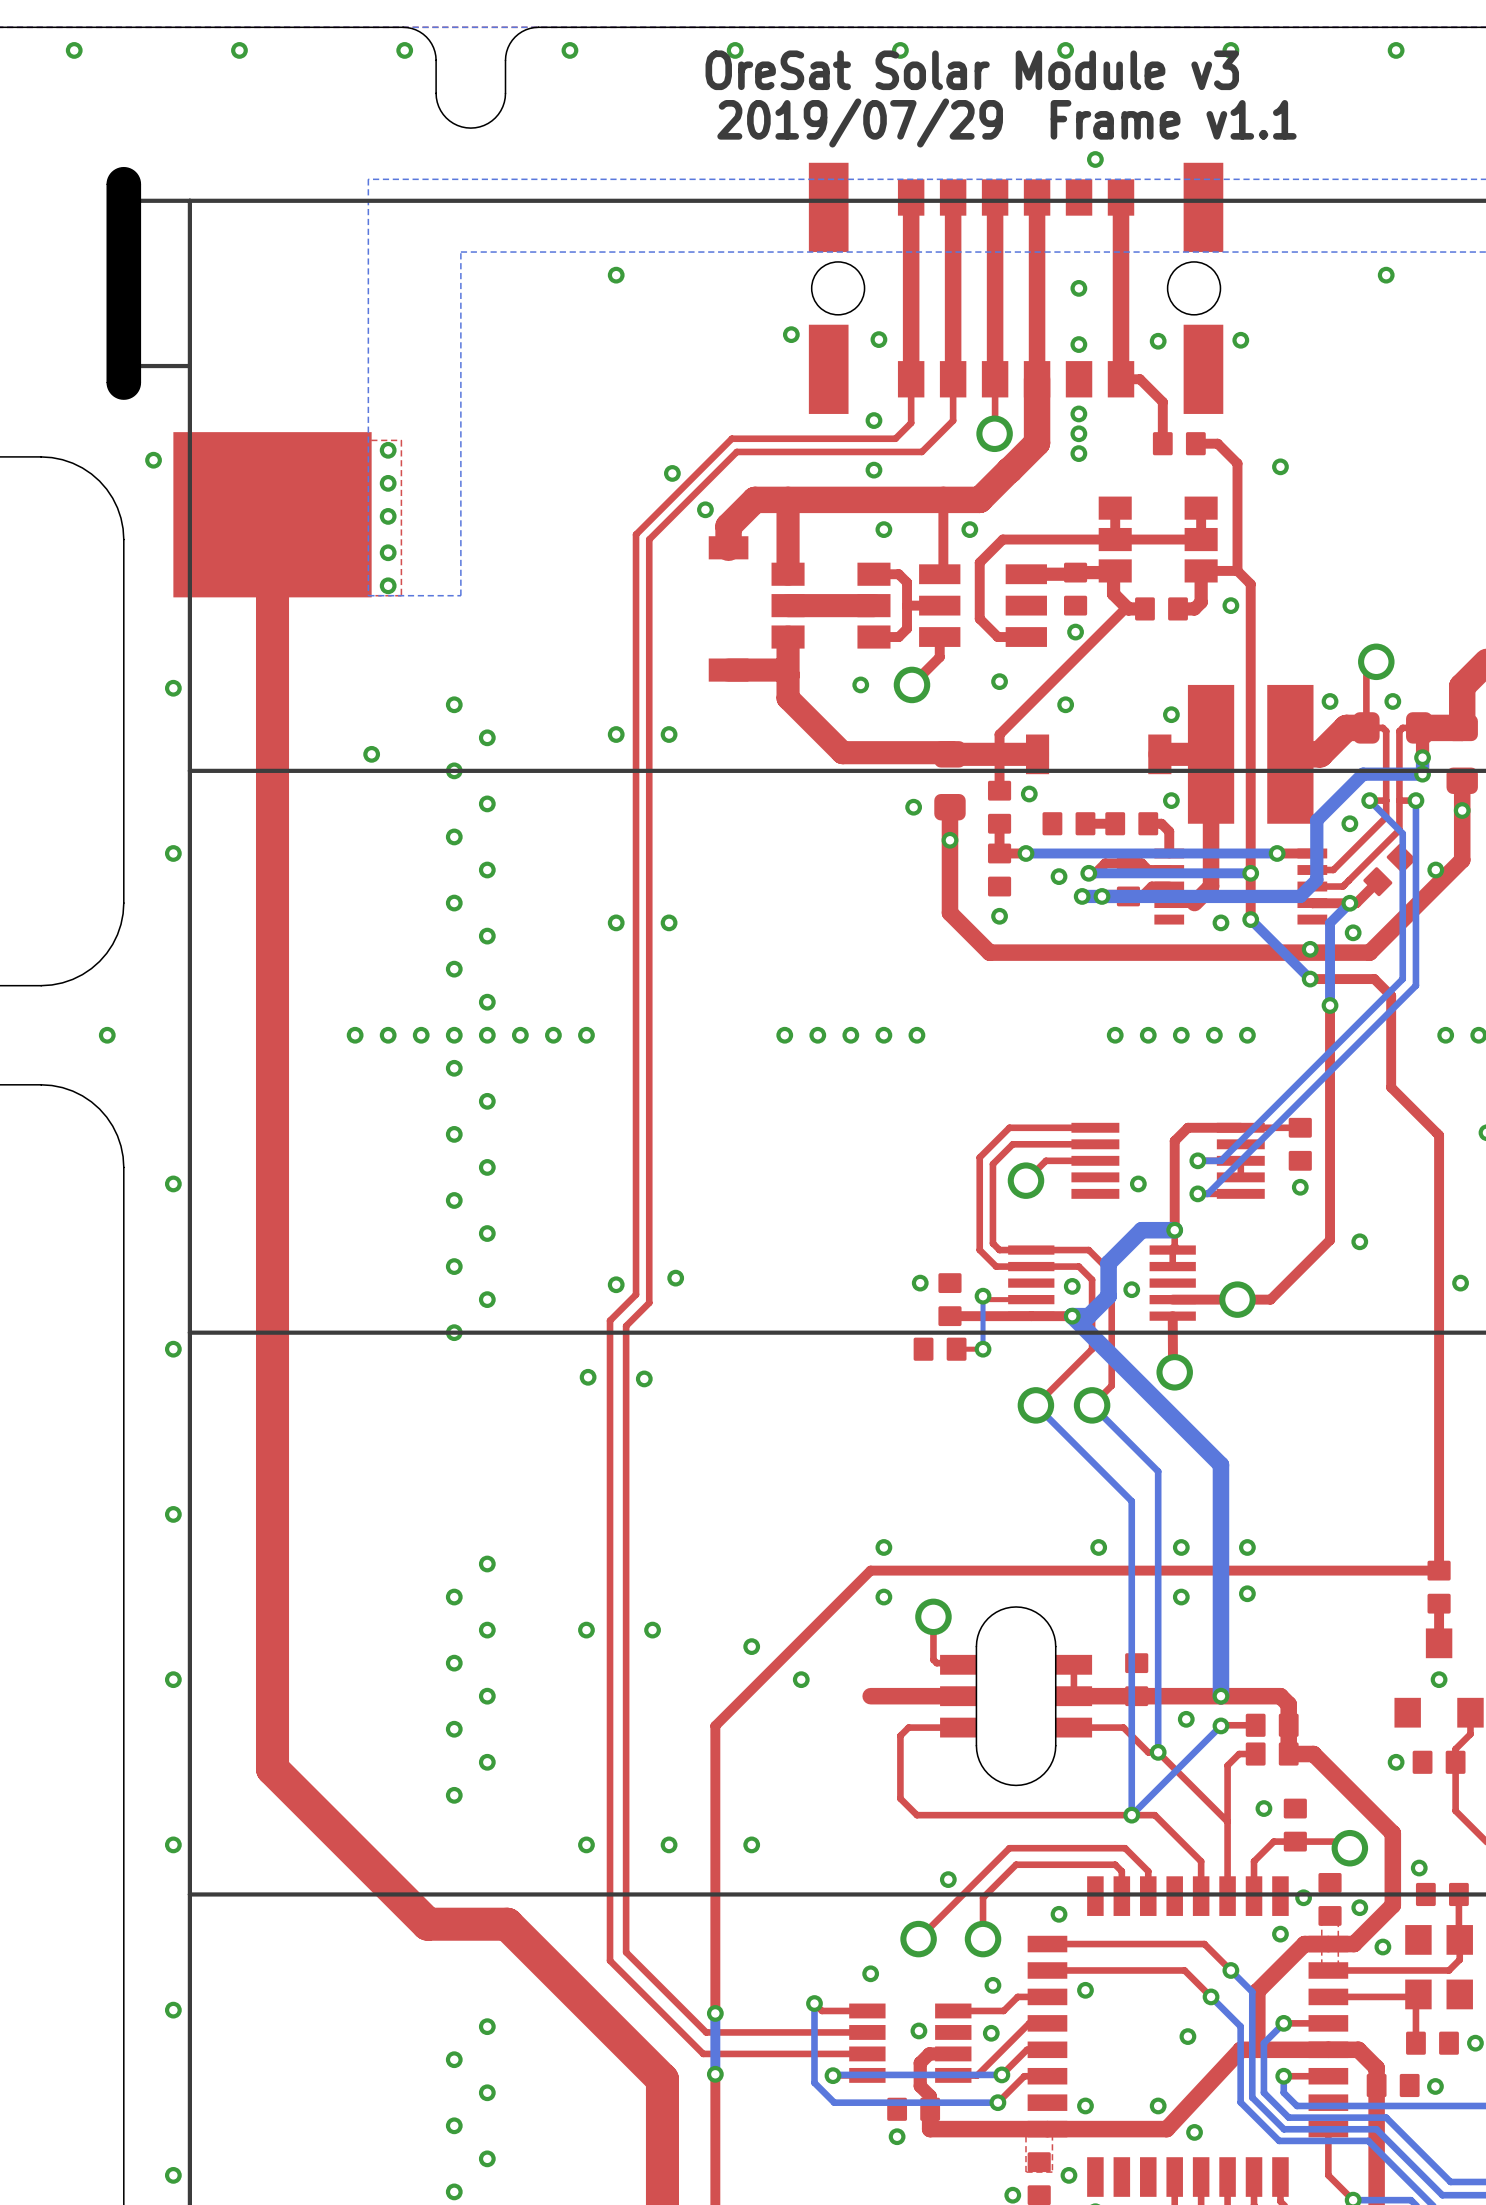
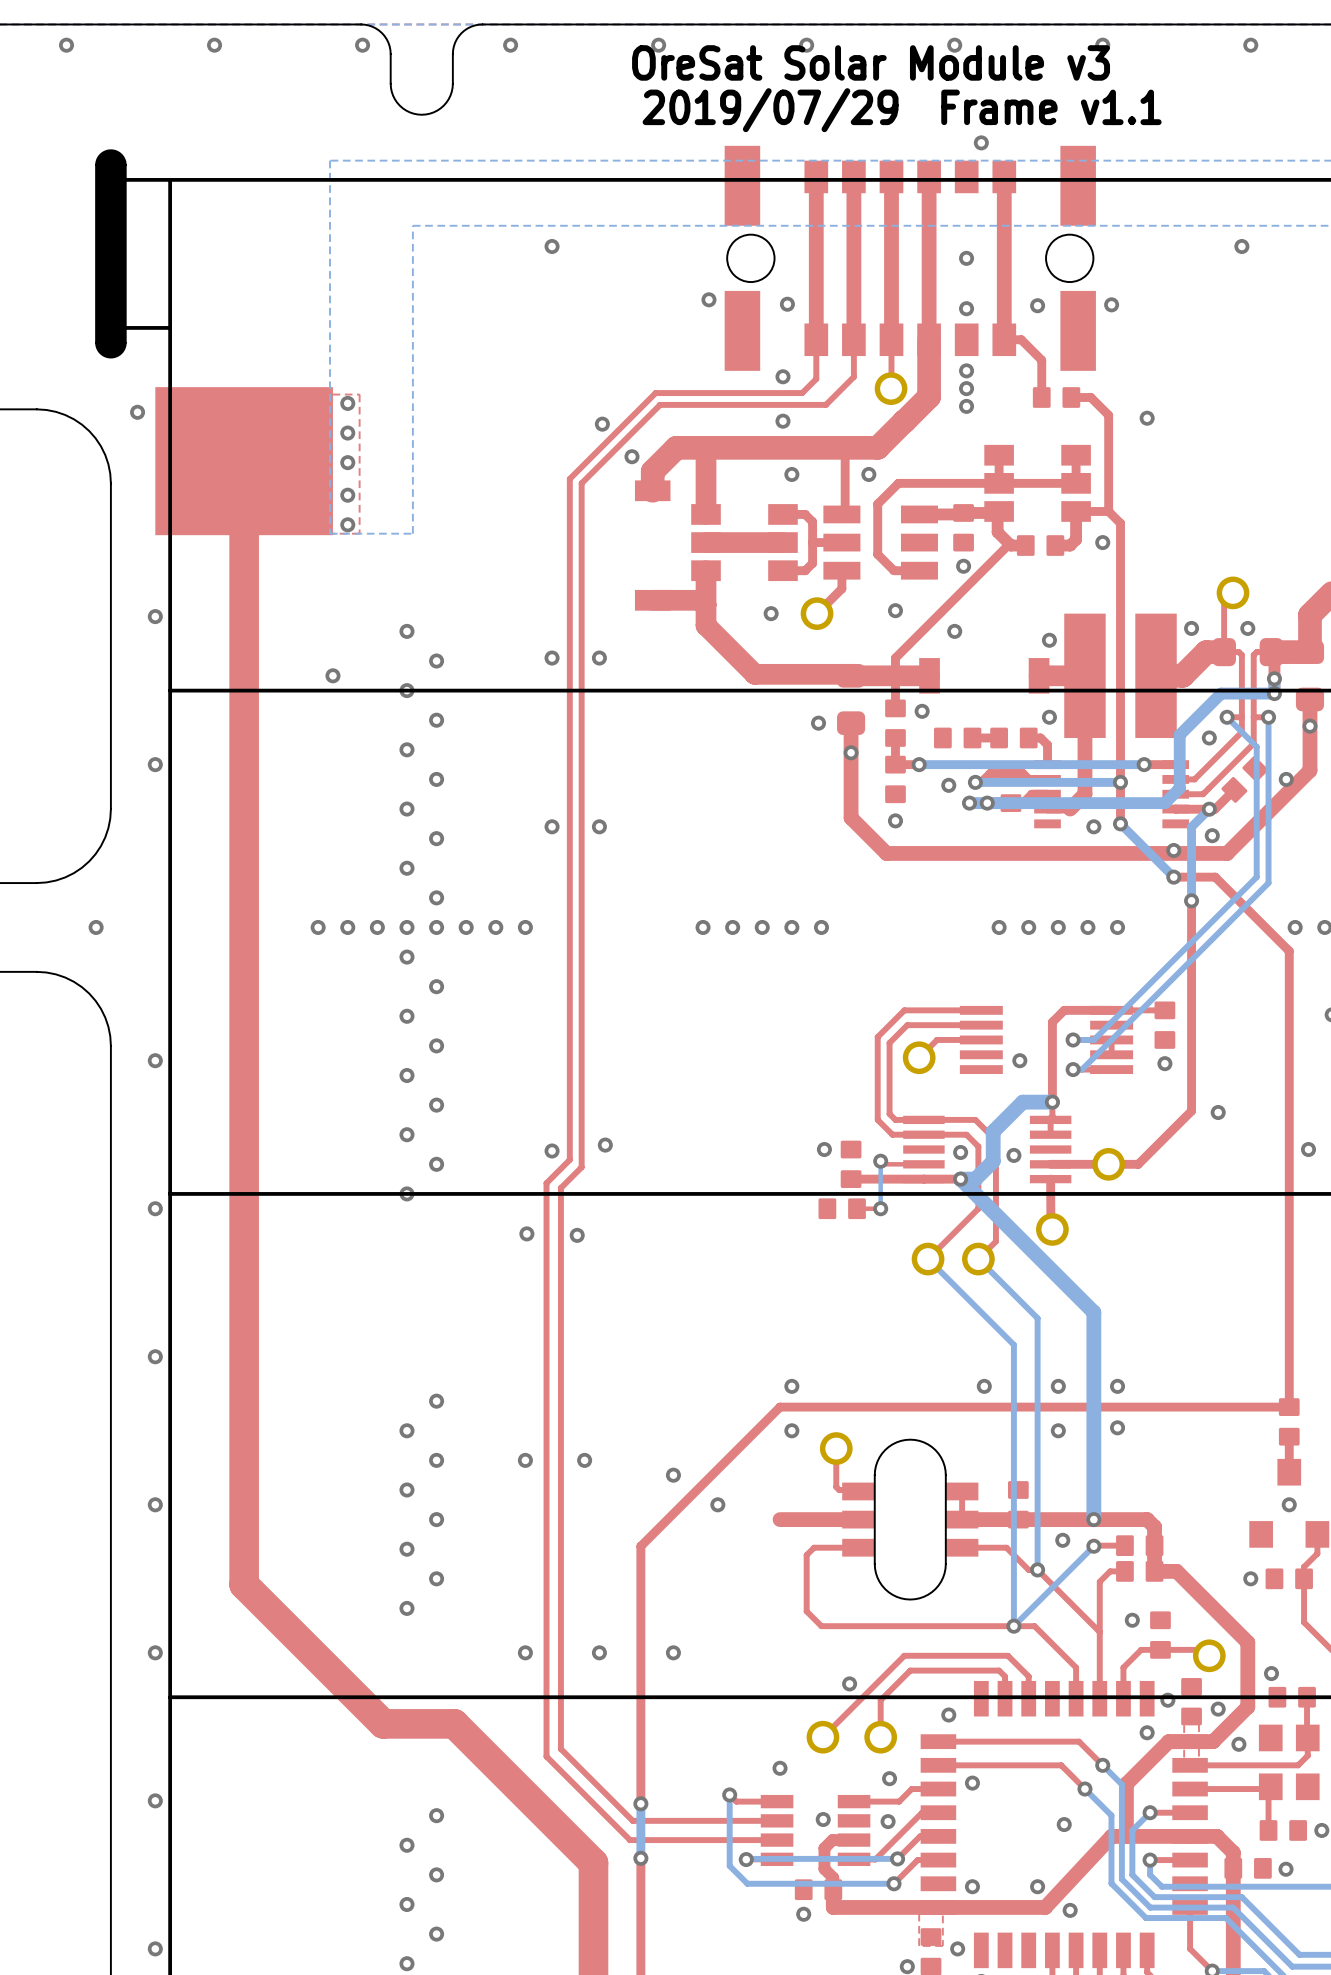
top track: (1356, 979) (1374, 979) (1391, 995) (1391, 1087) (1439, 1135) -> (1215, 877) (1289, 951) (1289, 1017)

